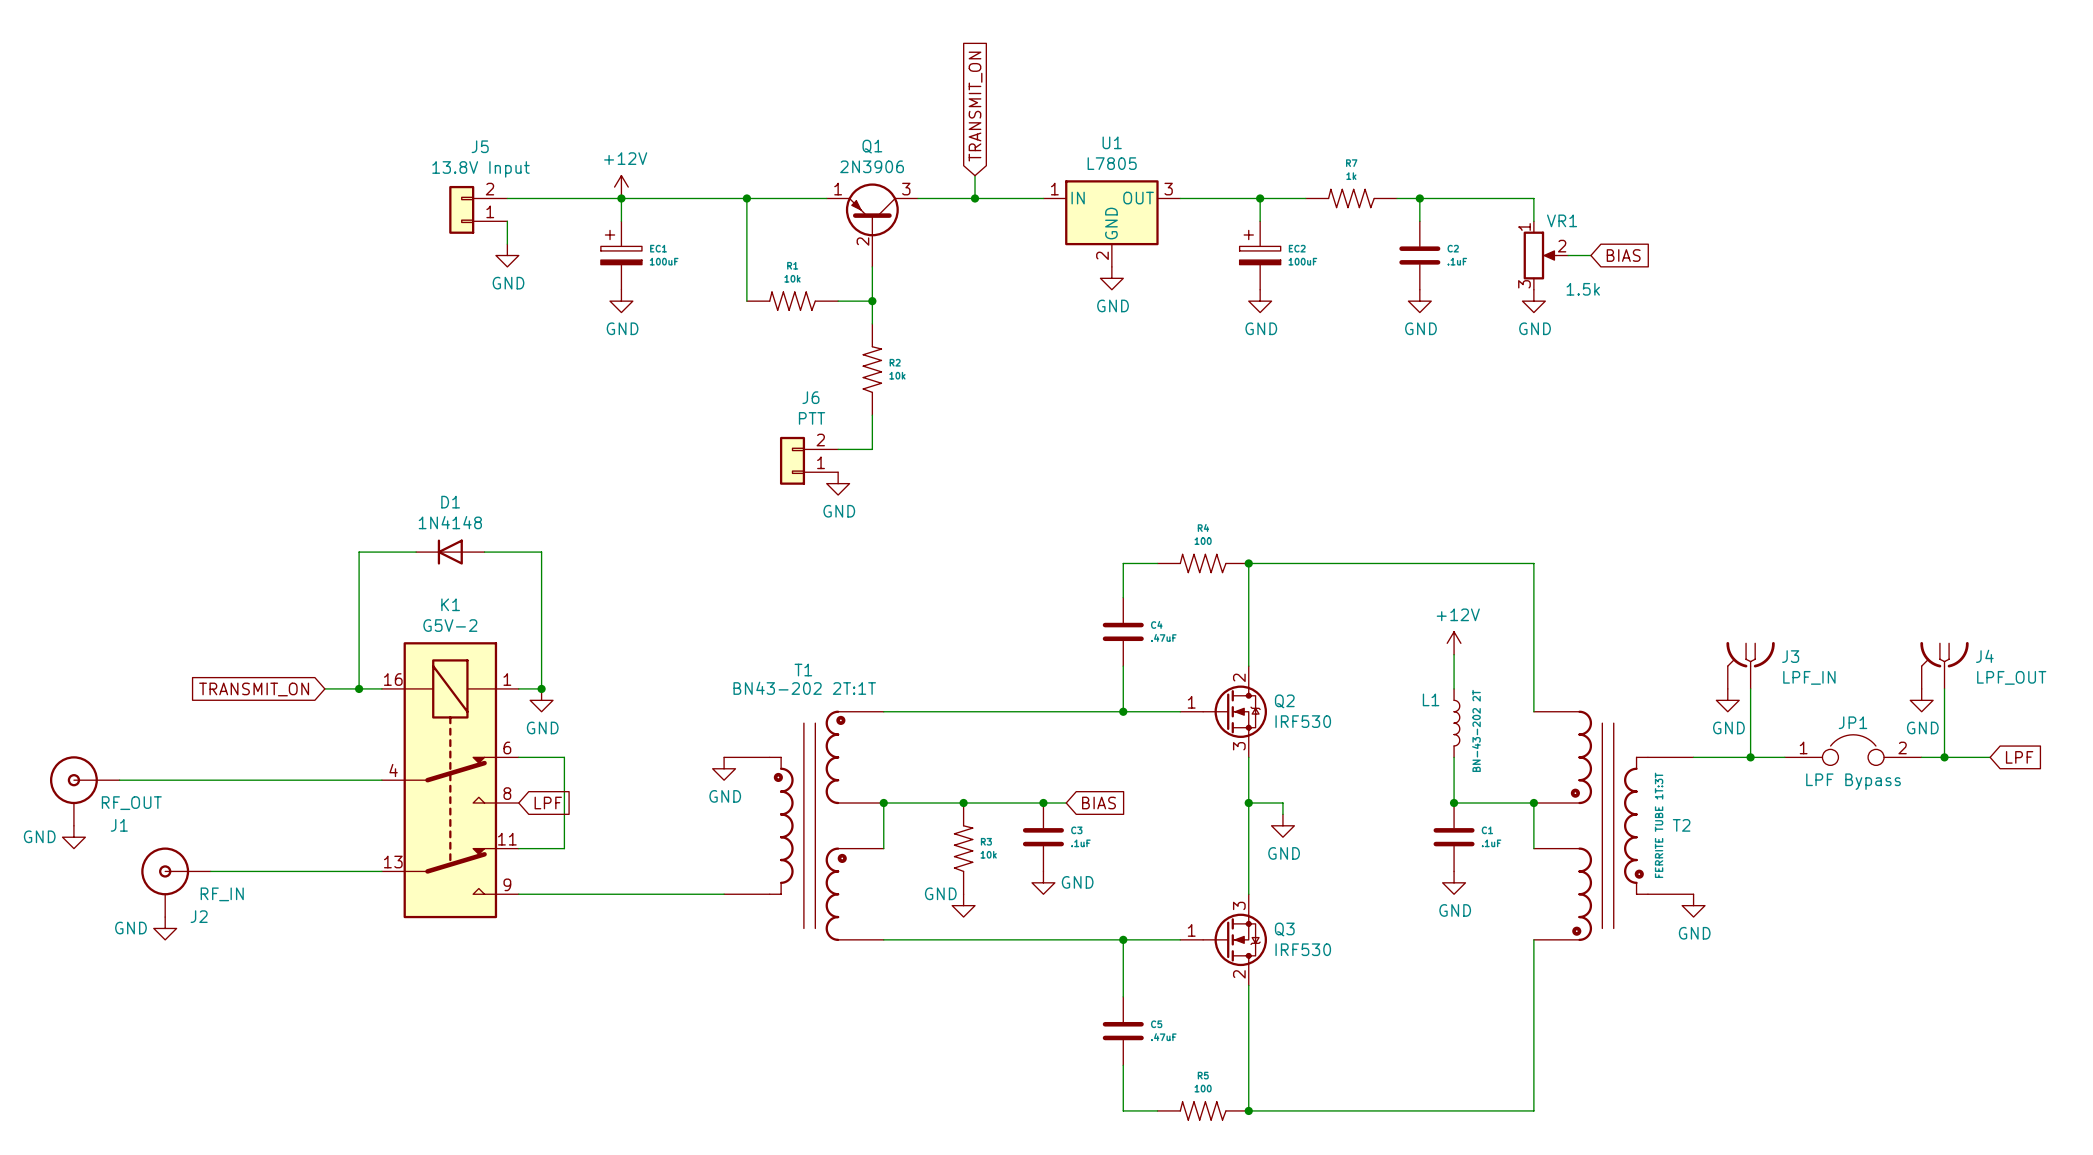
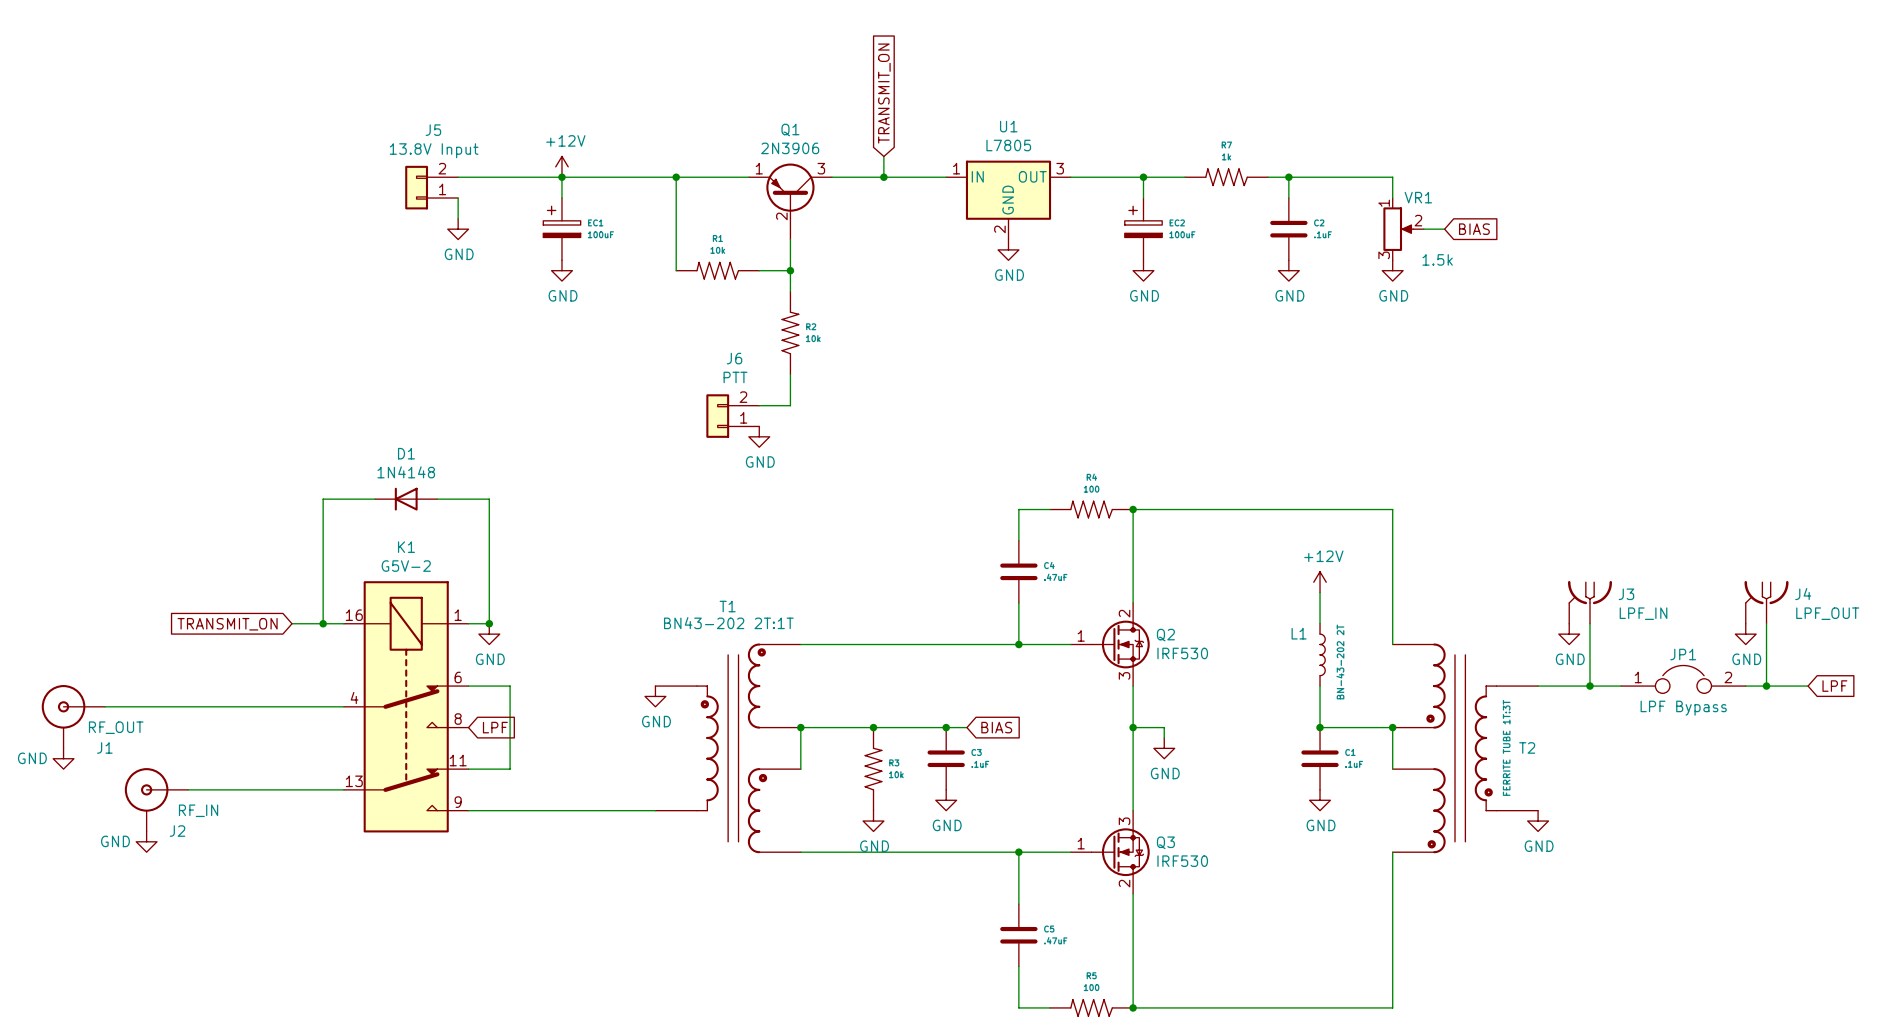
power symbol text position: GND (1077, 882) -> GND (947, 825)
power symbol text position: GND (940, 893) -> GND (874, 846)

